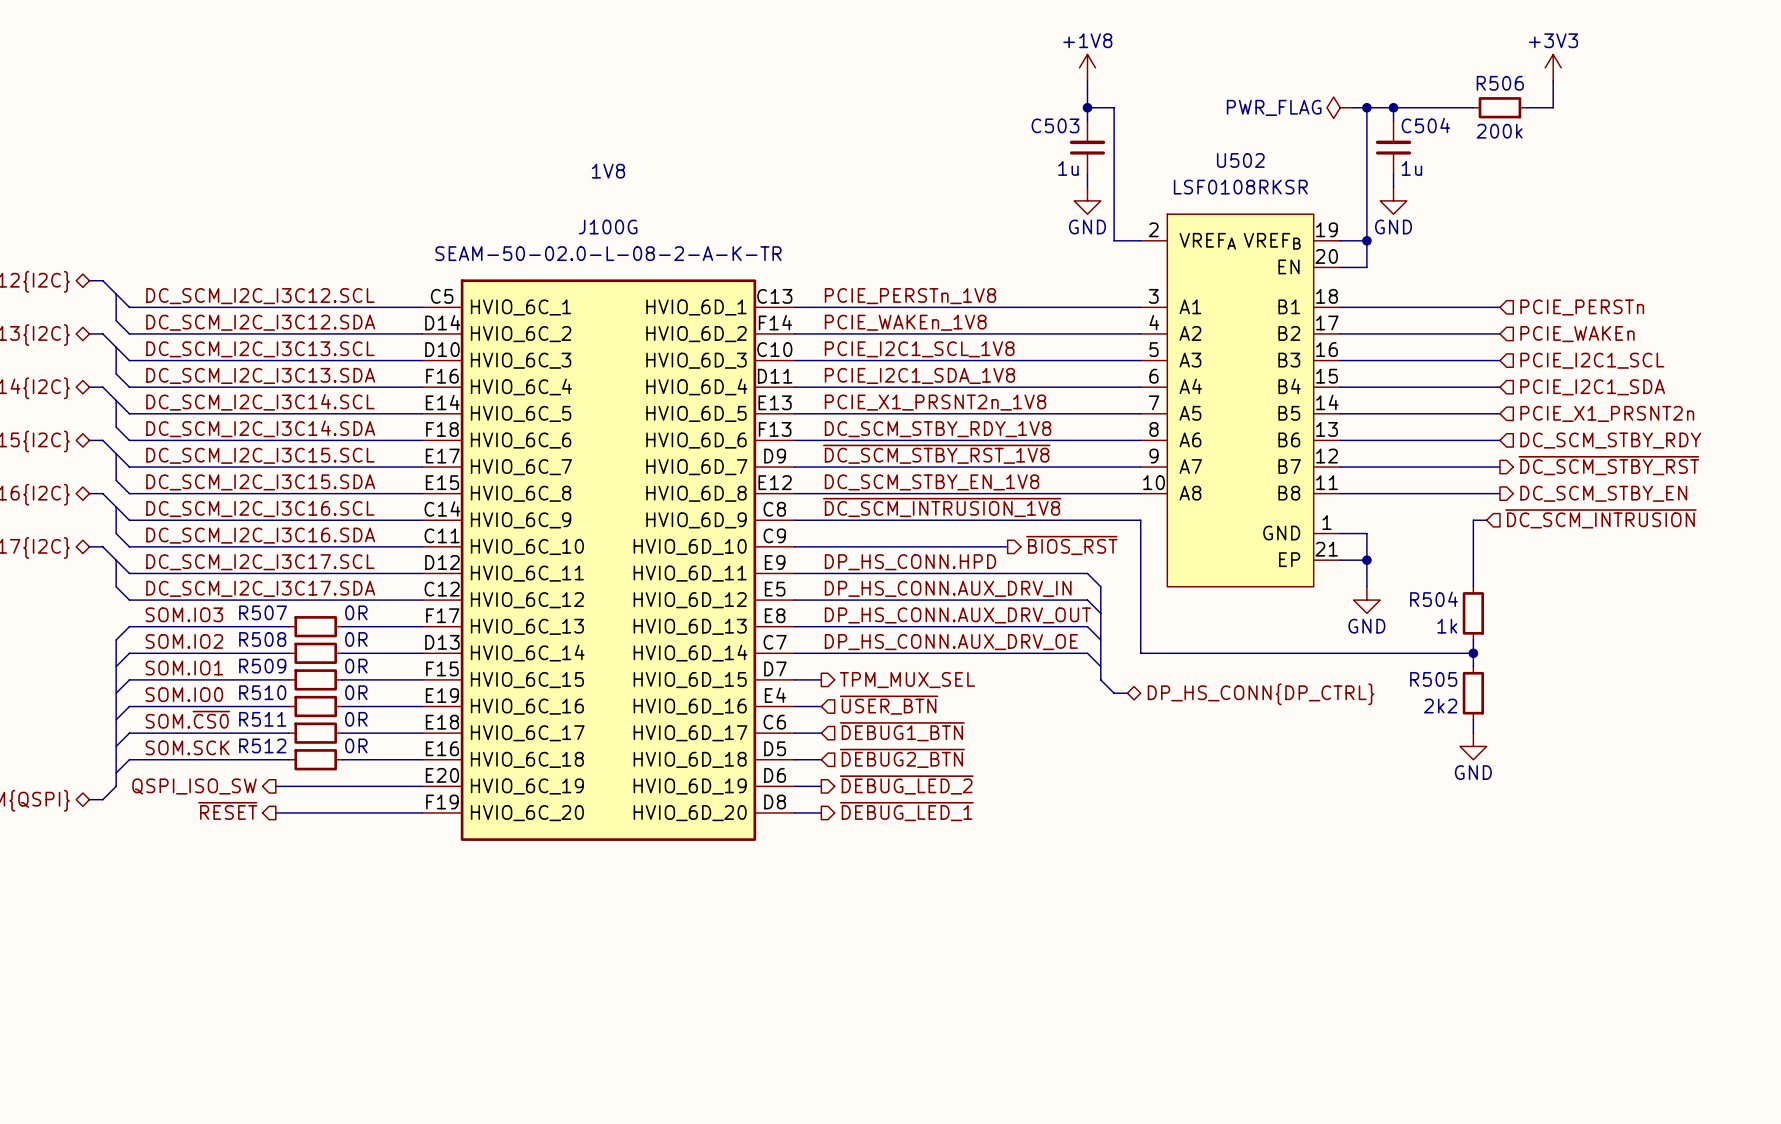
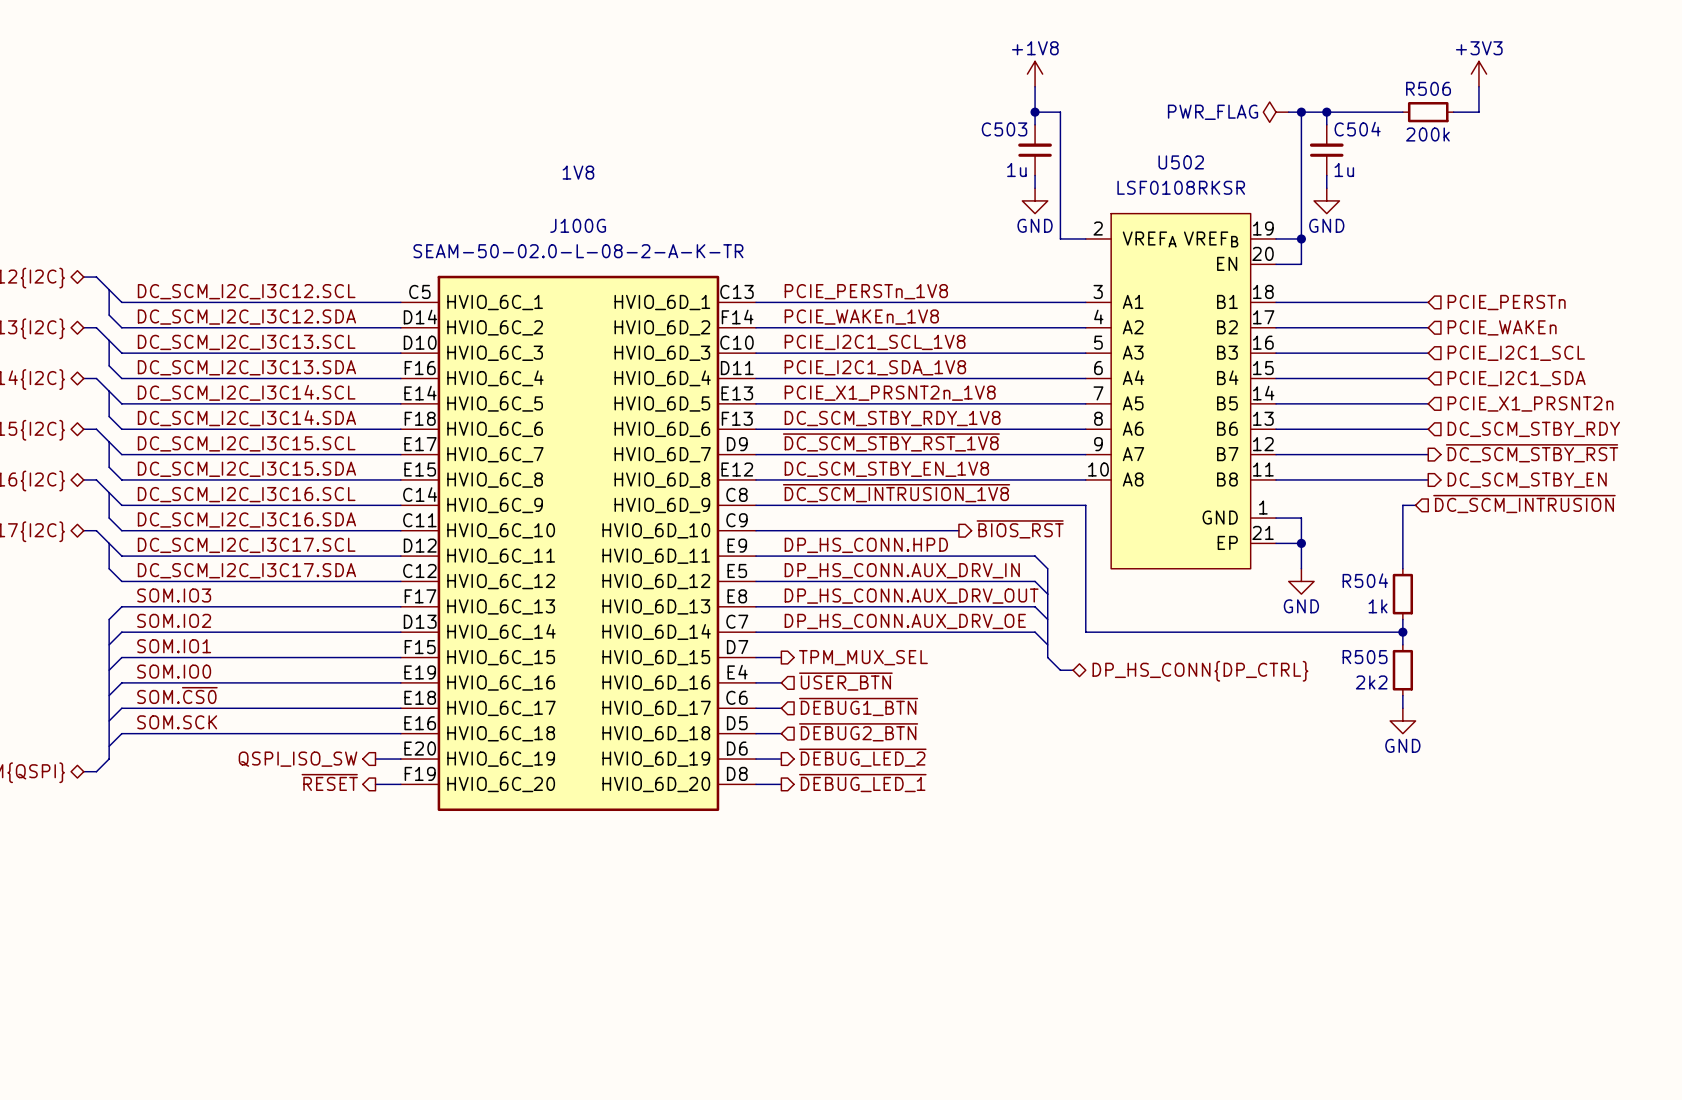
wire: none -> (274, 606) (324, 606)
R507: (315, 626) -> none
wire: none -> (274, 632) (324, 632)
R508: (315, 653) -> none
wire: none -> (274, 657) (324, 657)
R509: (315, 679) -> none
wire: none -> (274, 682) (324, 682)
R510: (315, 706) -> none
wire: none -> (274, 708) (324, 708)
R511: (315, 733) -> none
wire: none -> (274, 733) (324, 733)
R512: (315, 759) -> none
hierarchical label position: QSPI_ISO_SW (194, 786) -> QSPI_ISO_SW (297, 759)
wire: (275, 786) (395, 786) -> none
hierarchical label position: ~{RESET} (227, 810) -> ~{RESET} (329, 782)
wire: (275, 812) (395, 812) -> none

